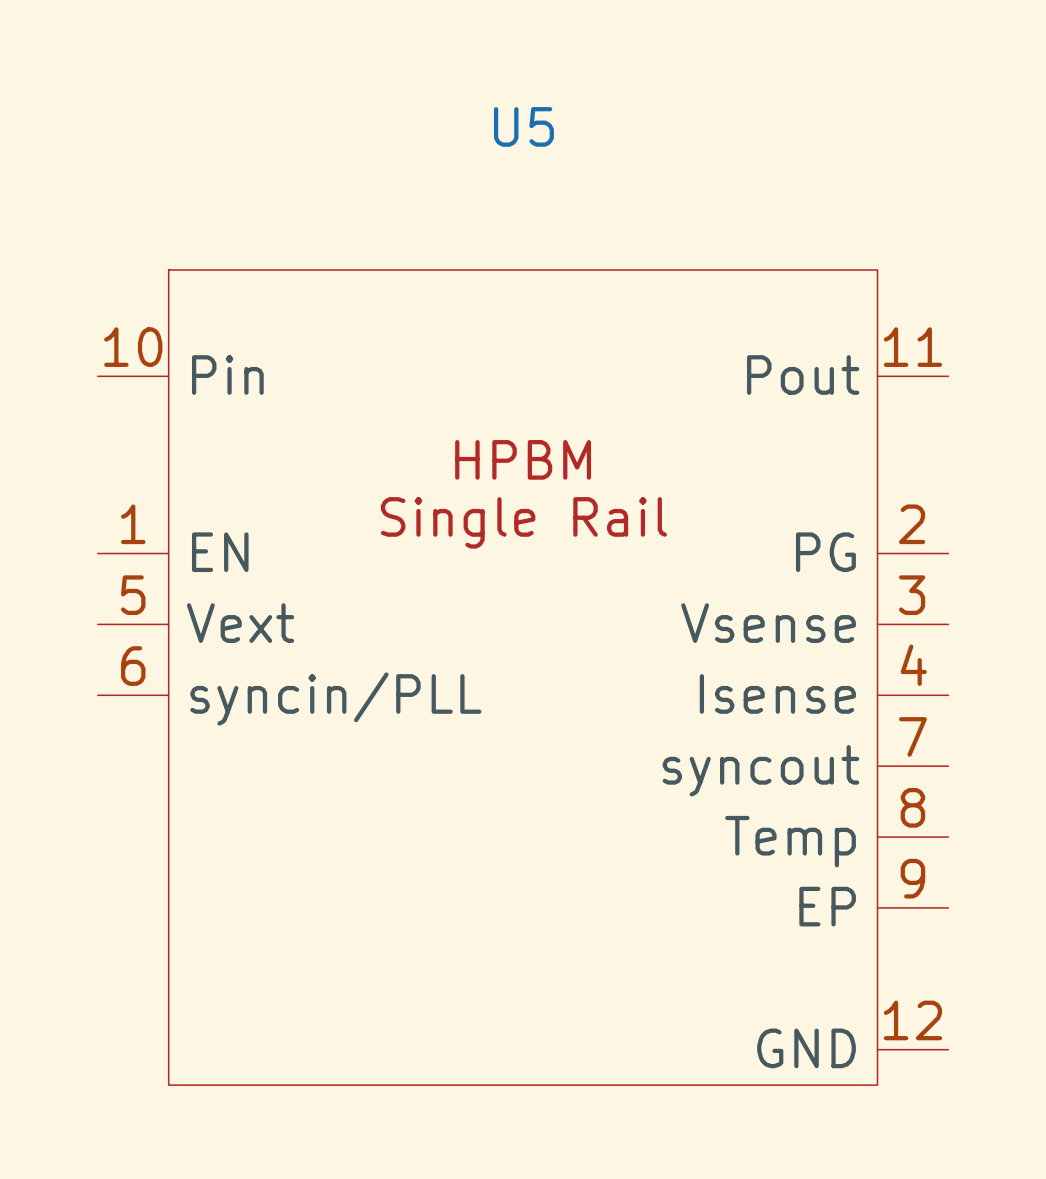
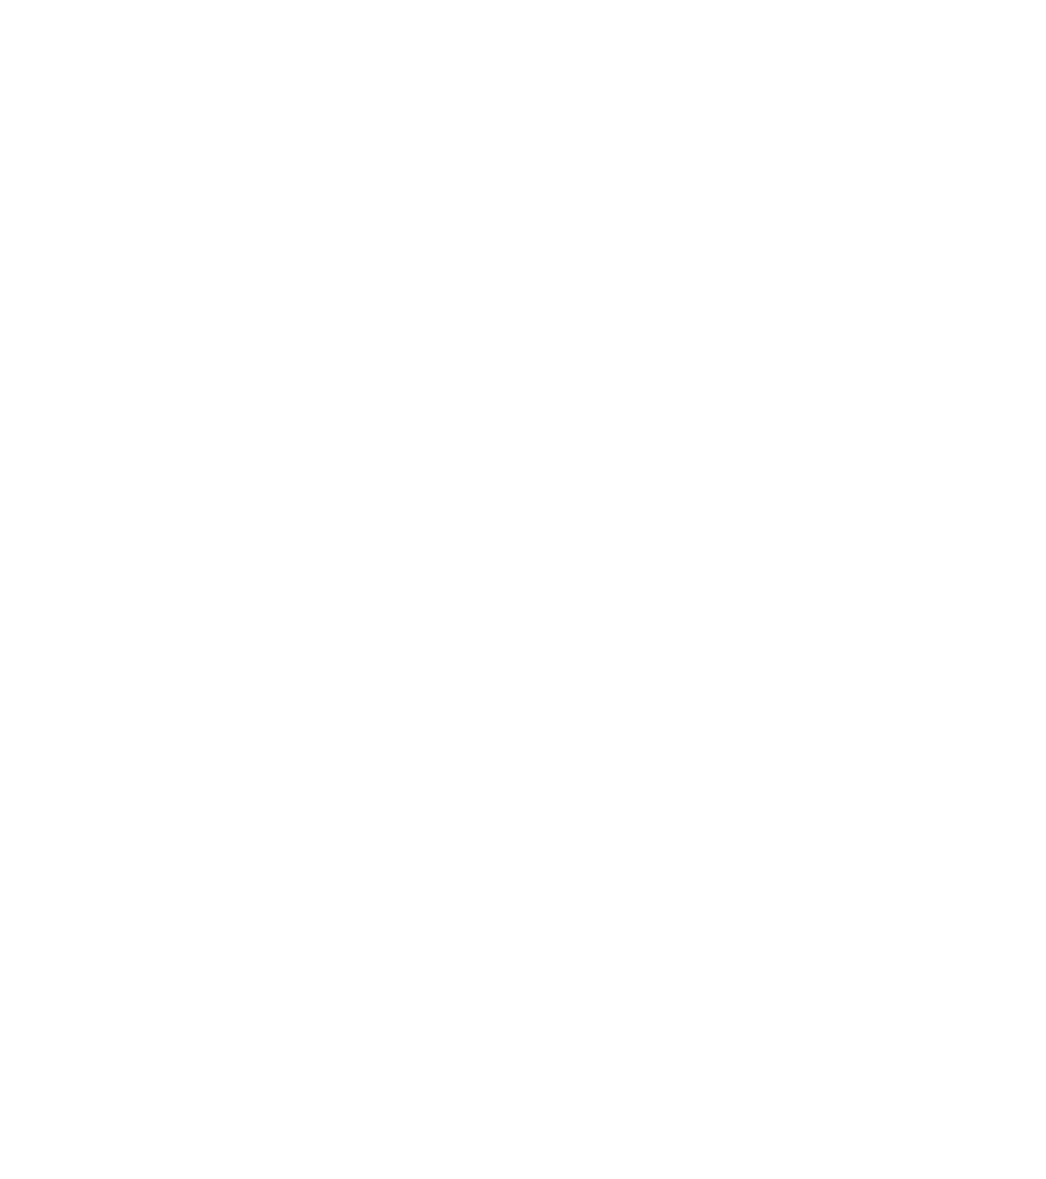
U5: (523, 677) -> none

